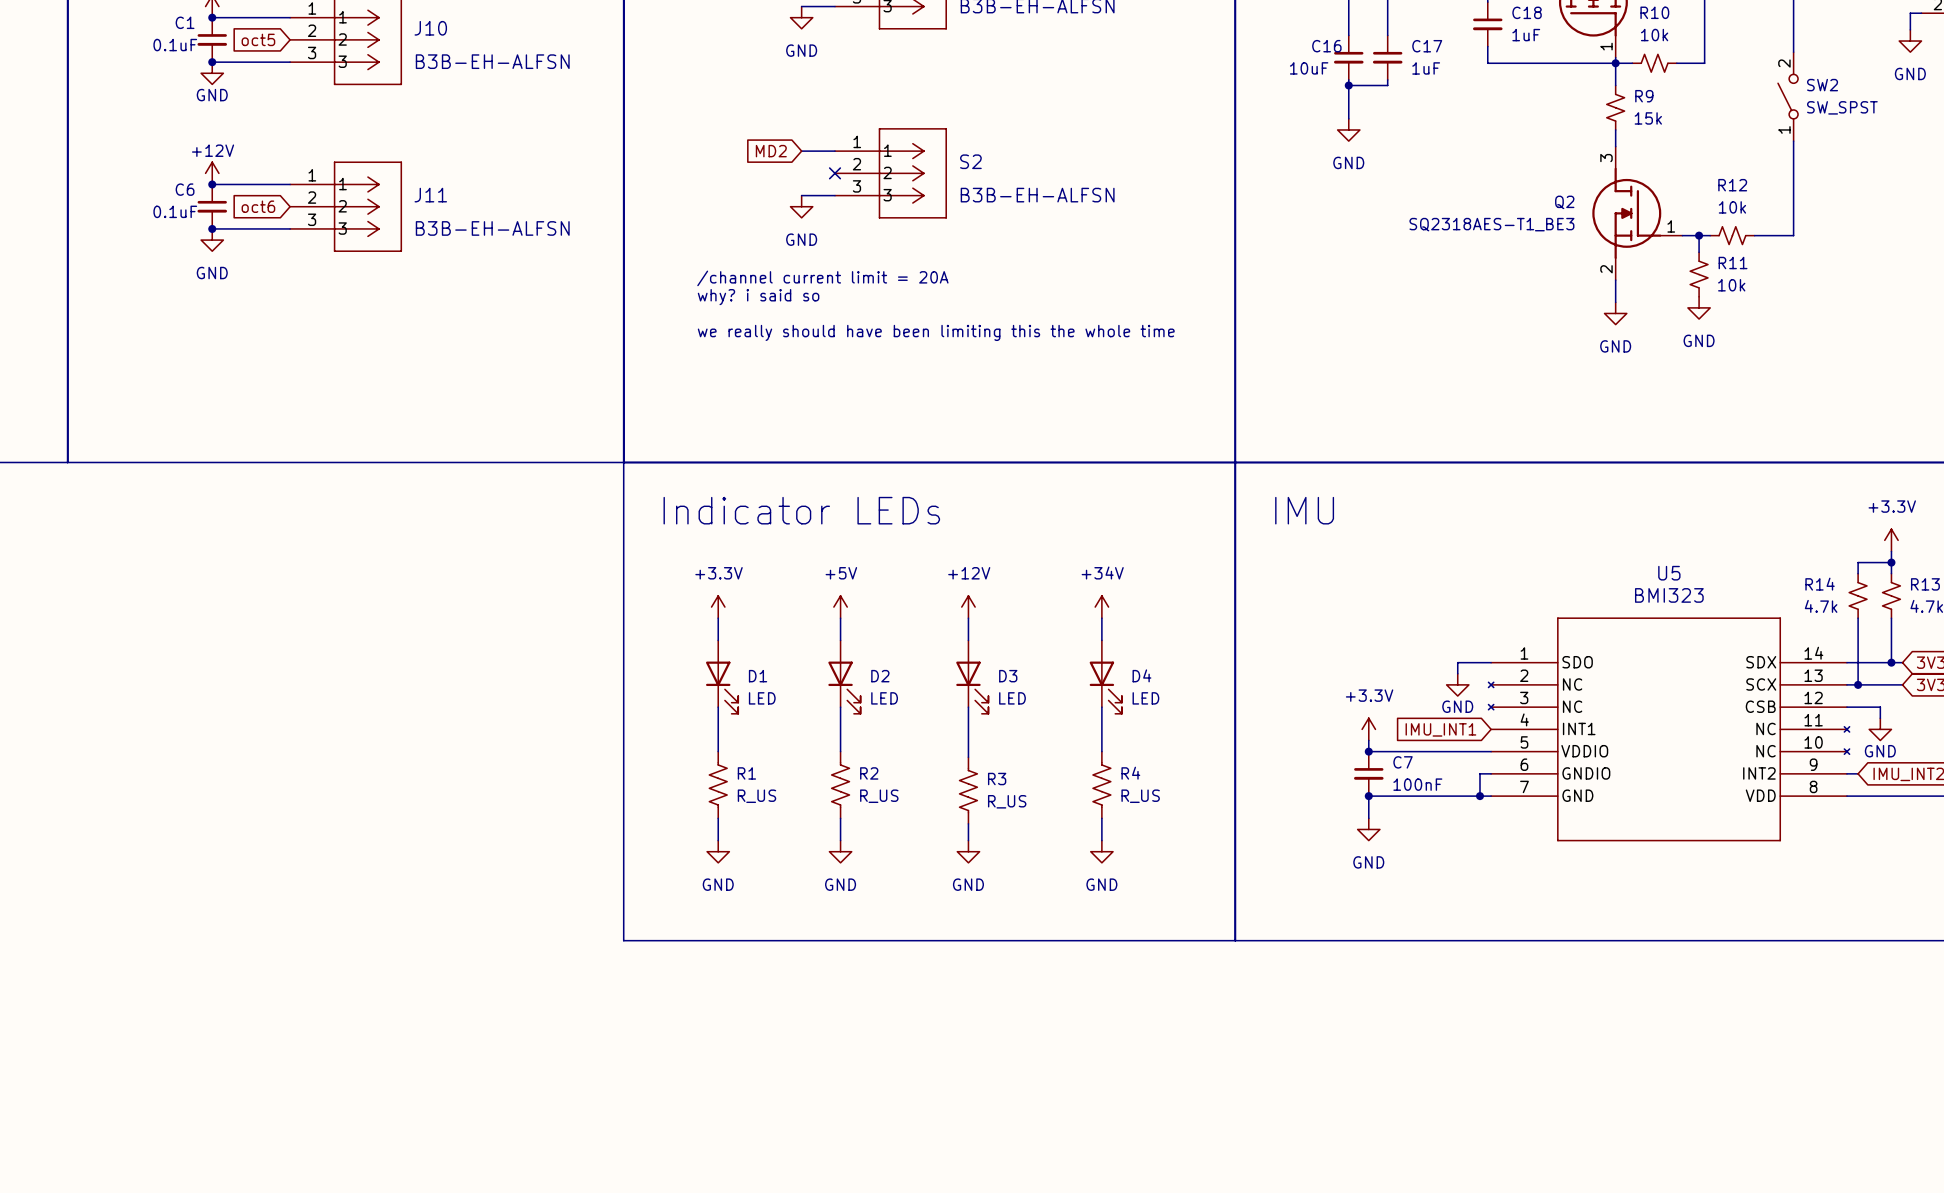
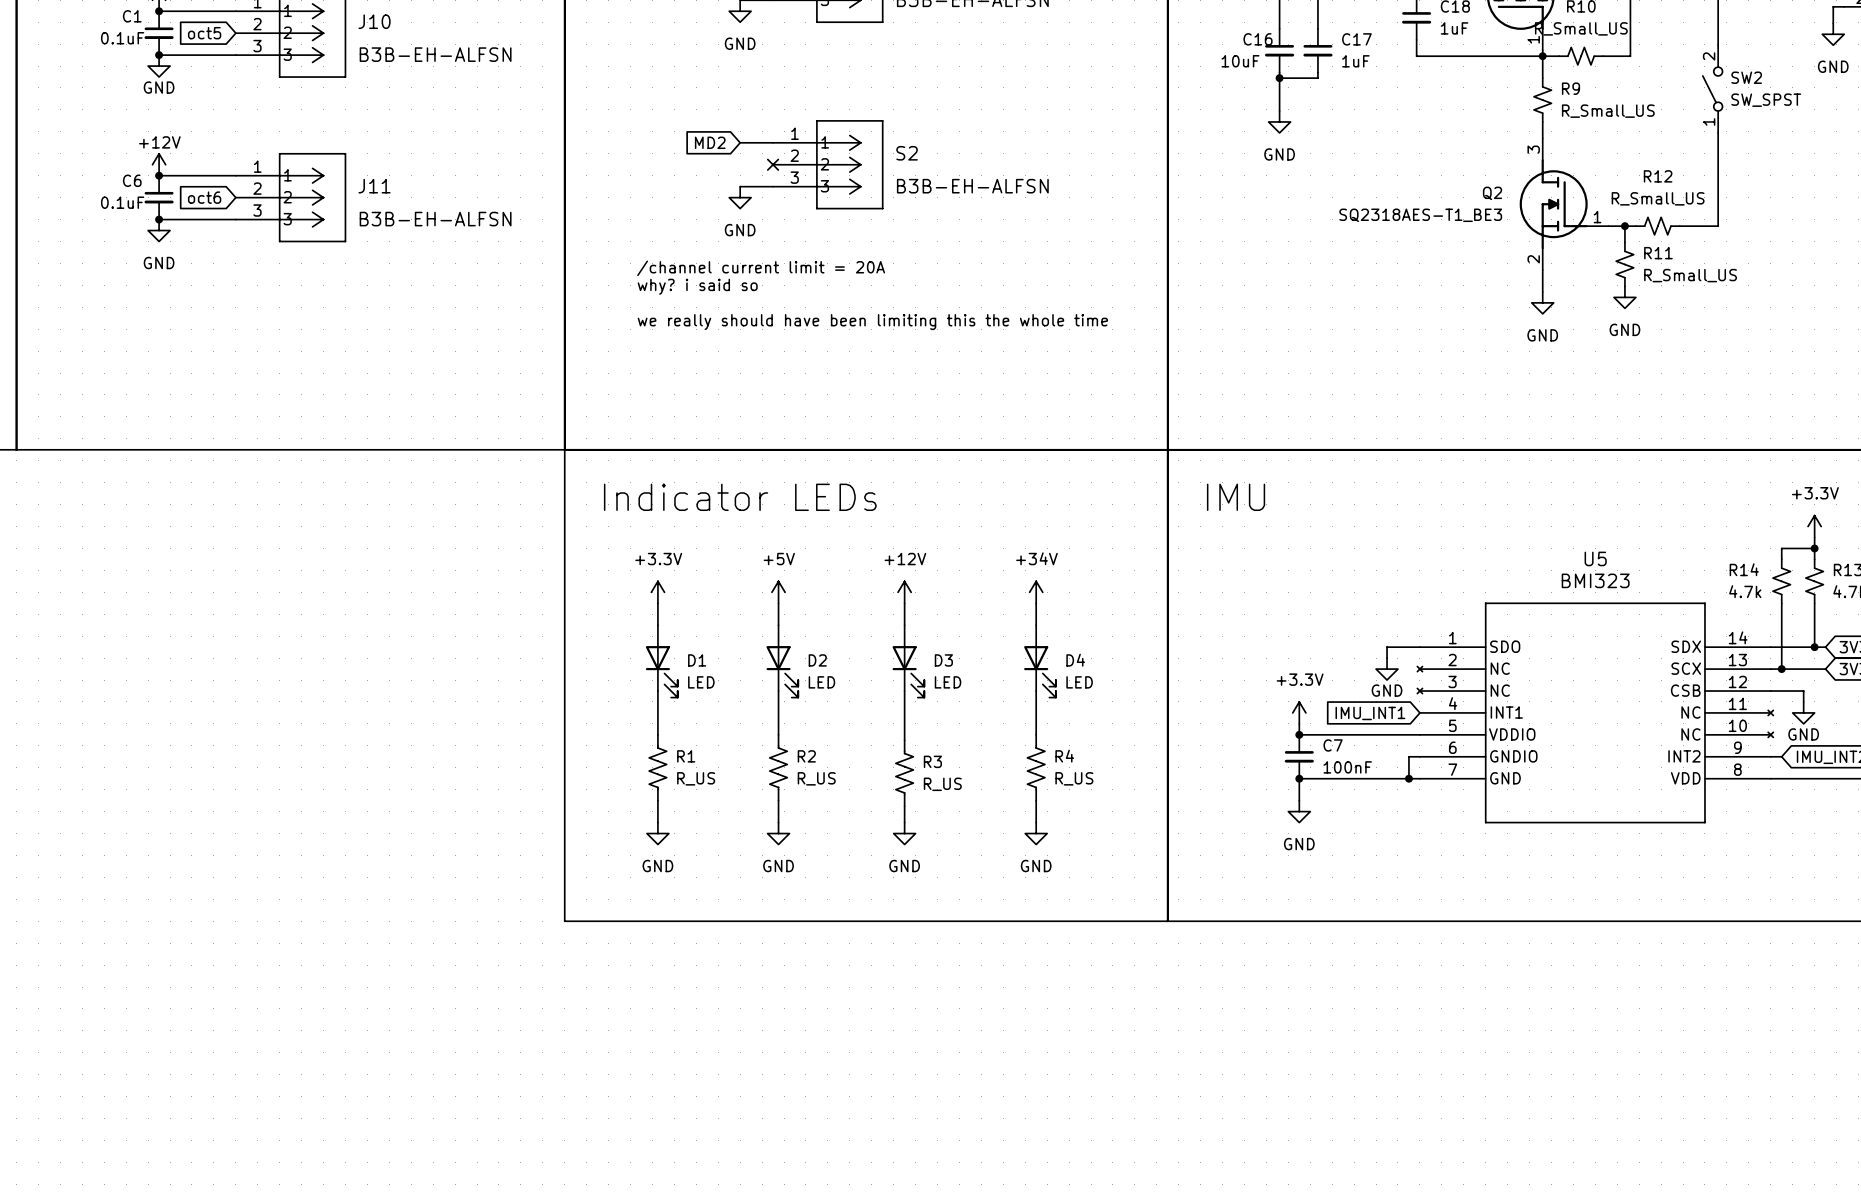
R10 value: 10k (1654, 35) -> R_Small_US (1581, 28)
R9 value: 15k (1648, 118) -> R_Small_US (1608, 111)
R12 value: 10k (1732, 207) -> R_Small_US (1658, 198)
R11 value: 10k (1731, 285) -> R_Small_US (1690, 275)

